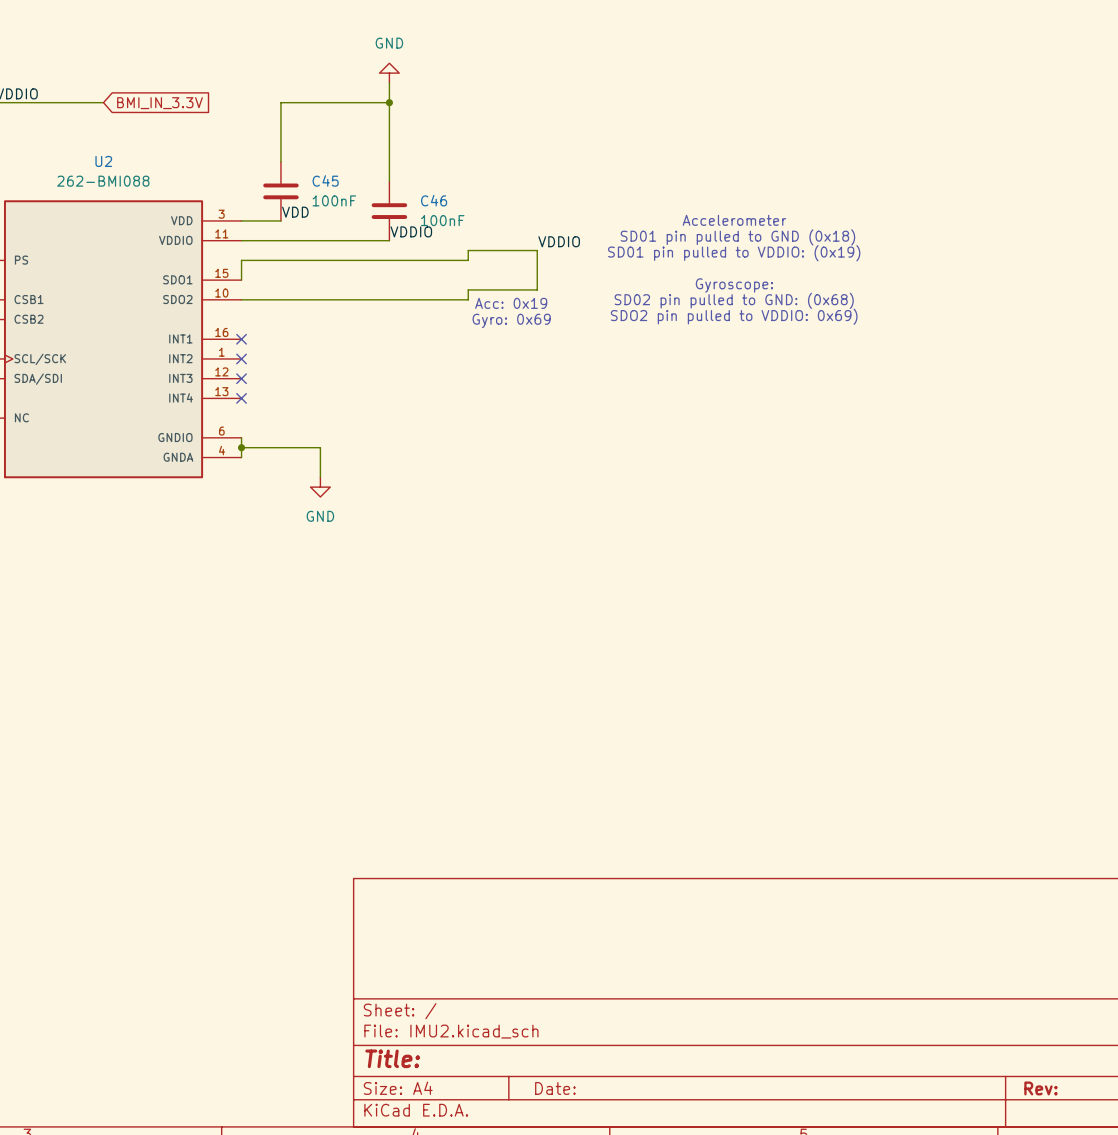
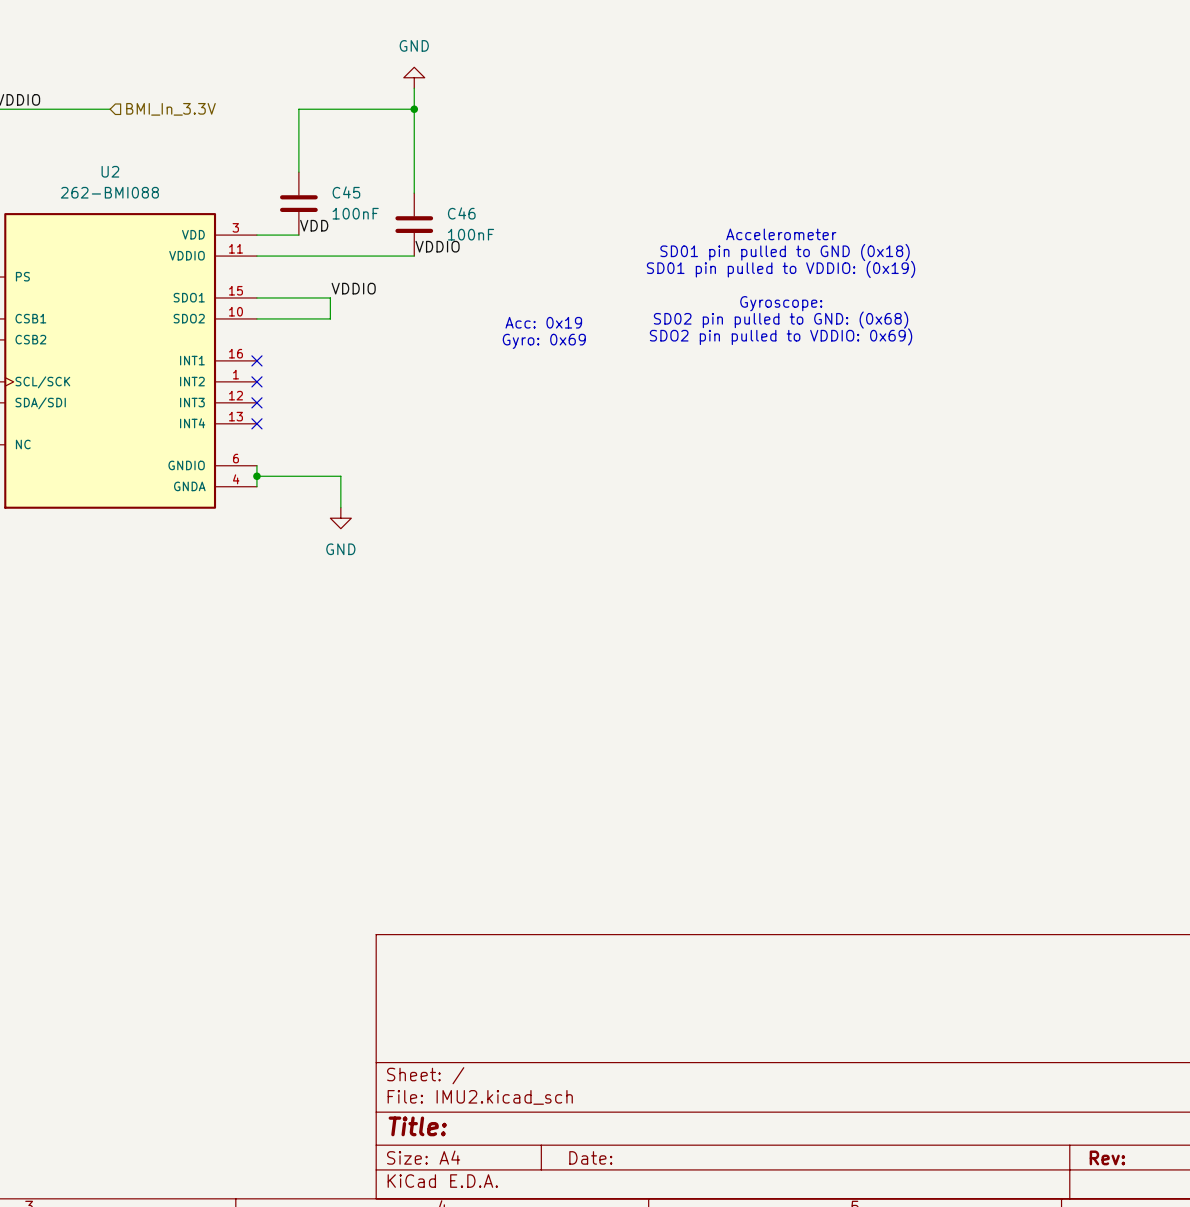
hierarchical label: none -> BMI_In_3.3V (170, 109)
global label: BMI_IN_3.3V (160, 103) -> none
label: VDDIO (559, 241) -> none
label: none -> VDDIO (353, 288)
wire: (241, 280) (241, 260) (468, 260) (468, 250) (537, 250) (537, 289) (468, 289) (468, 299) (310, 299) -> (256, 297) (330, 297) (330, 318)

